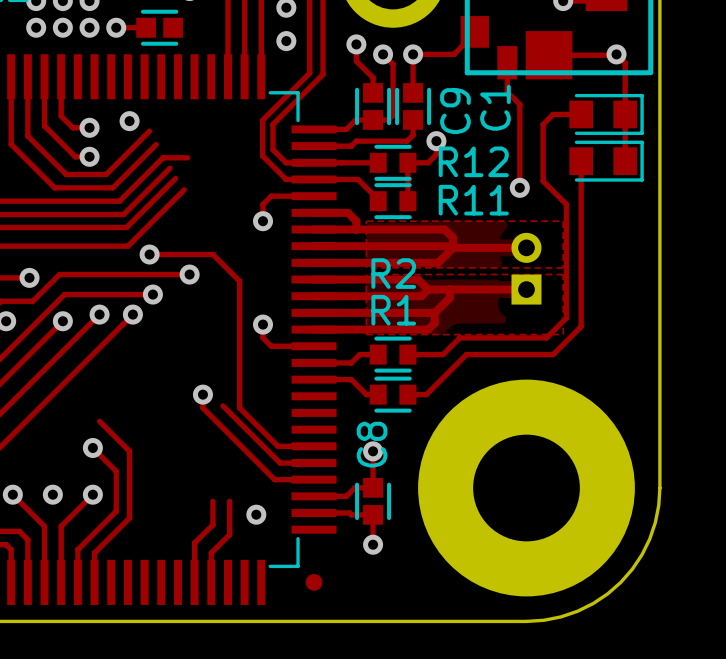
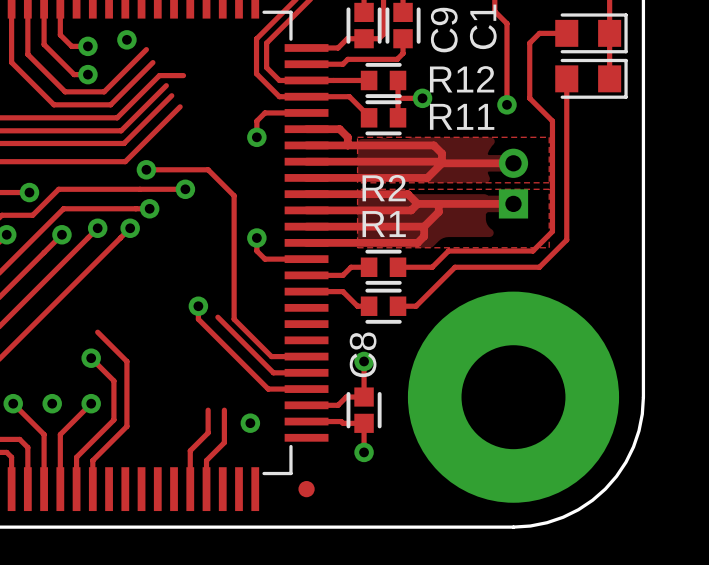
track: (436, 141) (436, 154) (428, 162) (407, 162) -> none
via position: (436, 141) -> (422, 98)
track: none -> (398, 98) (422, 98)

